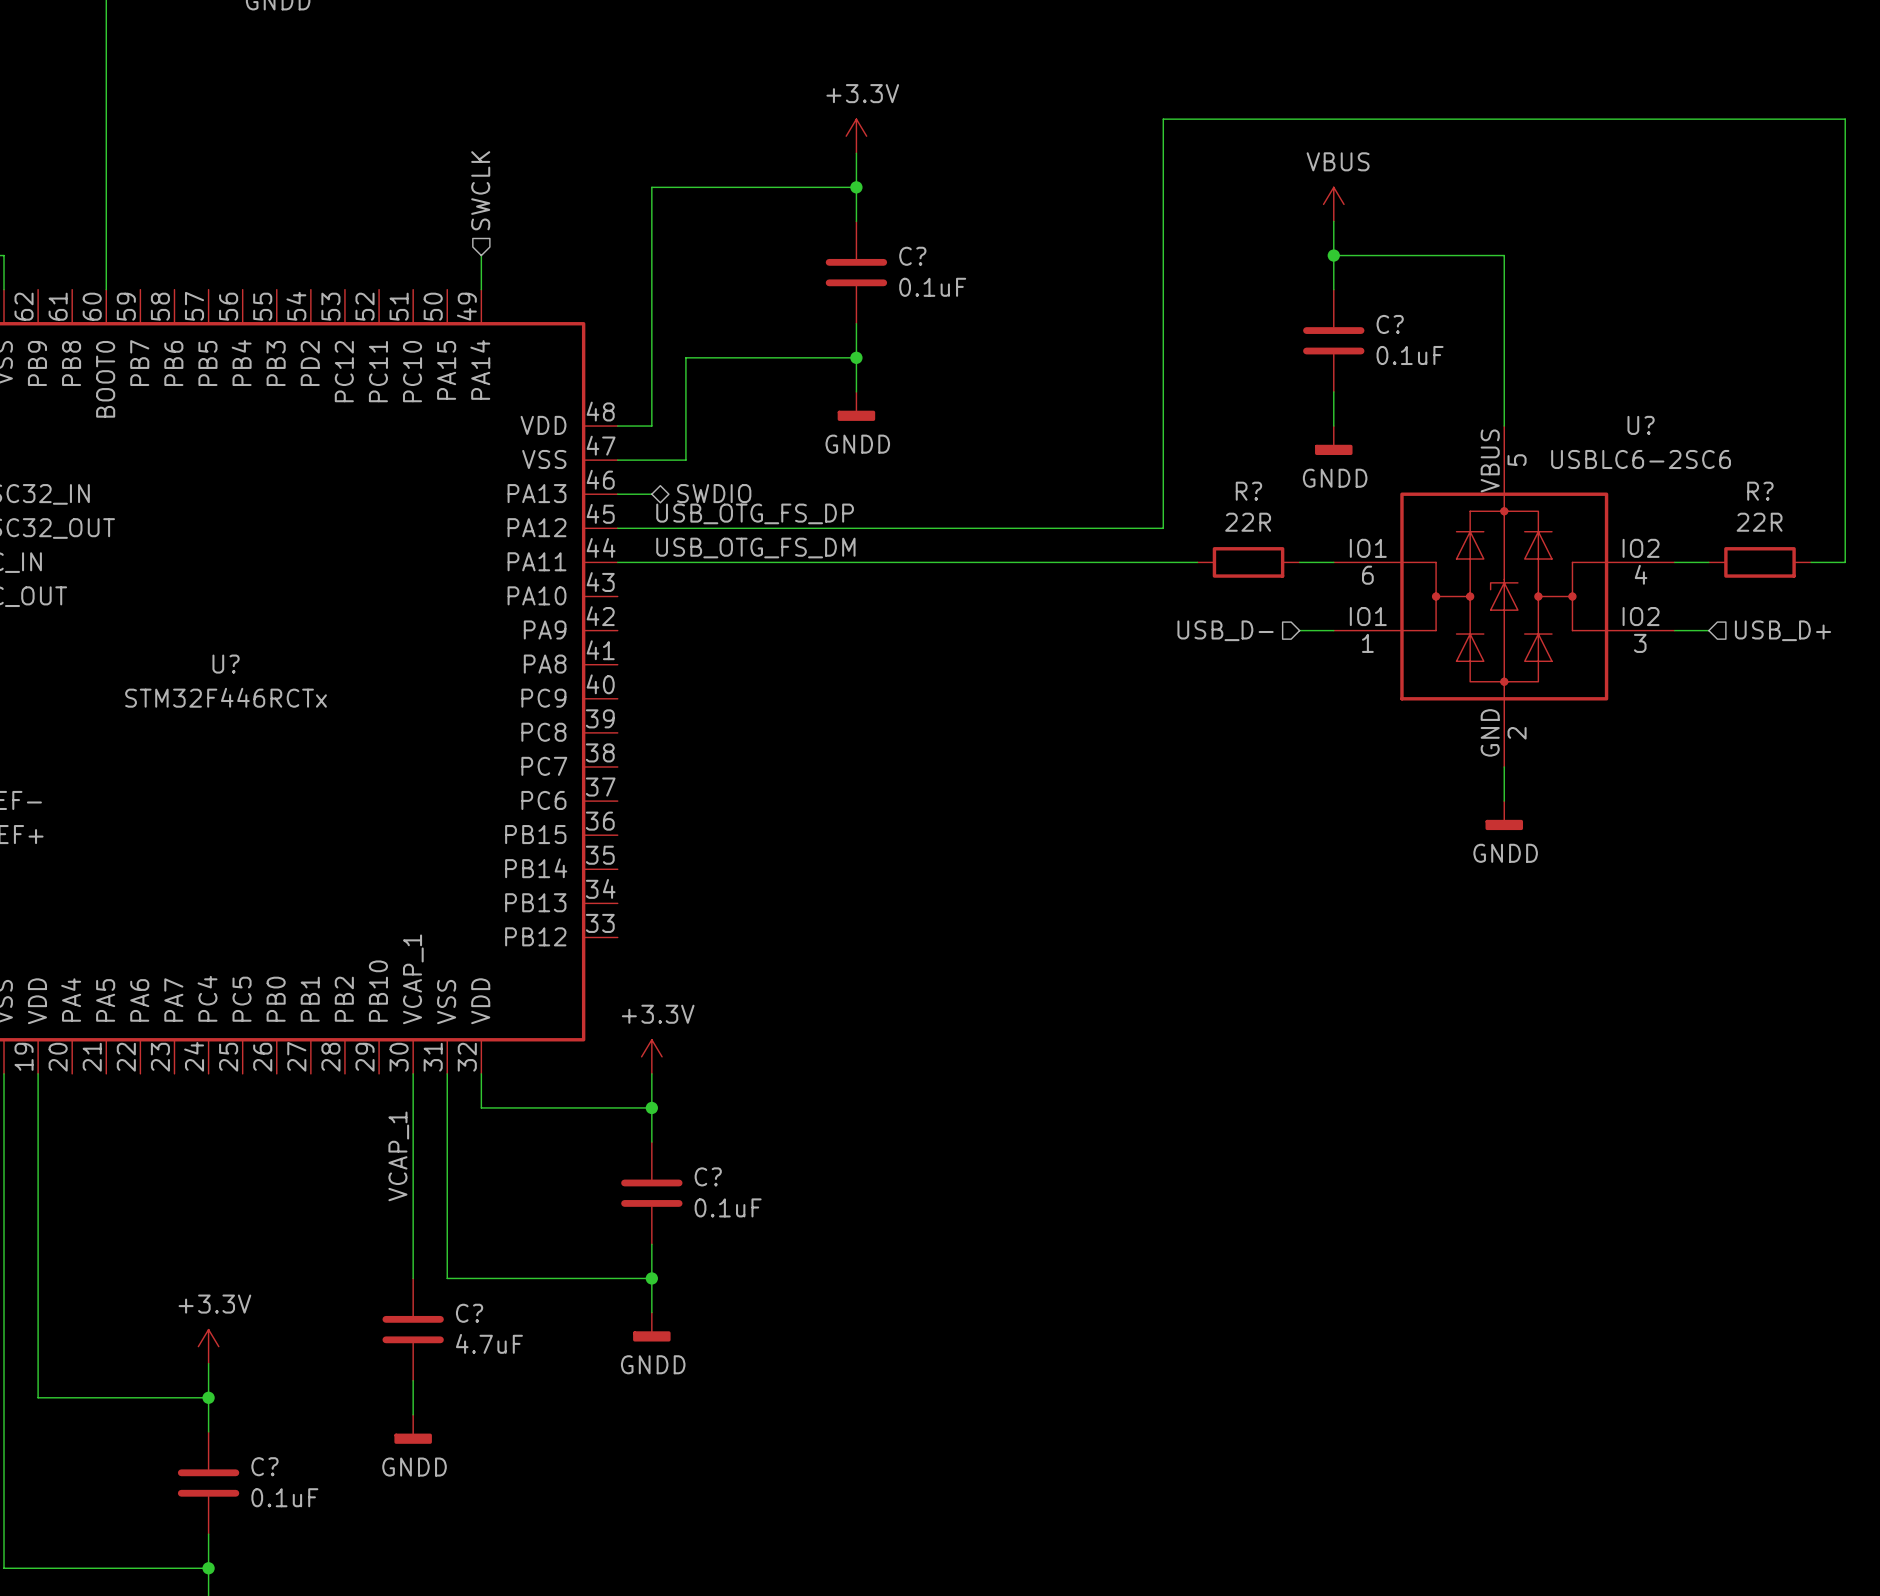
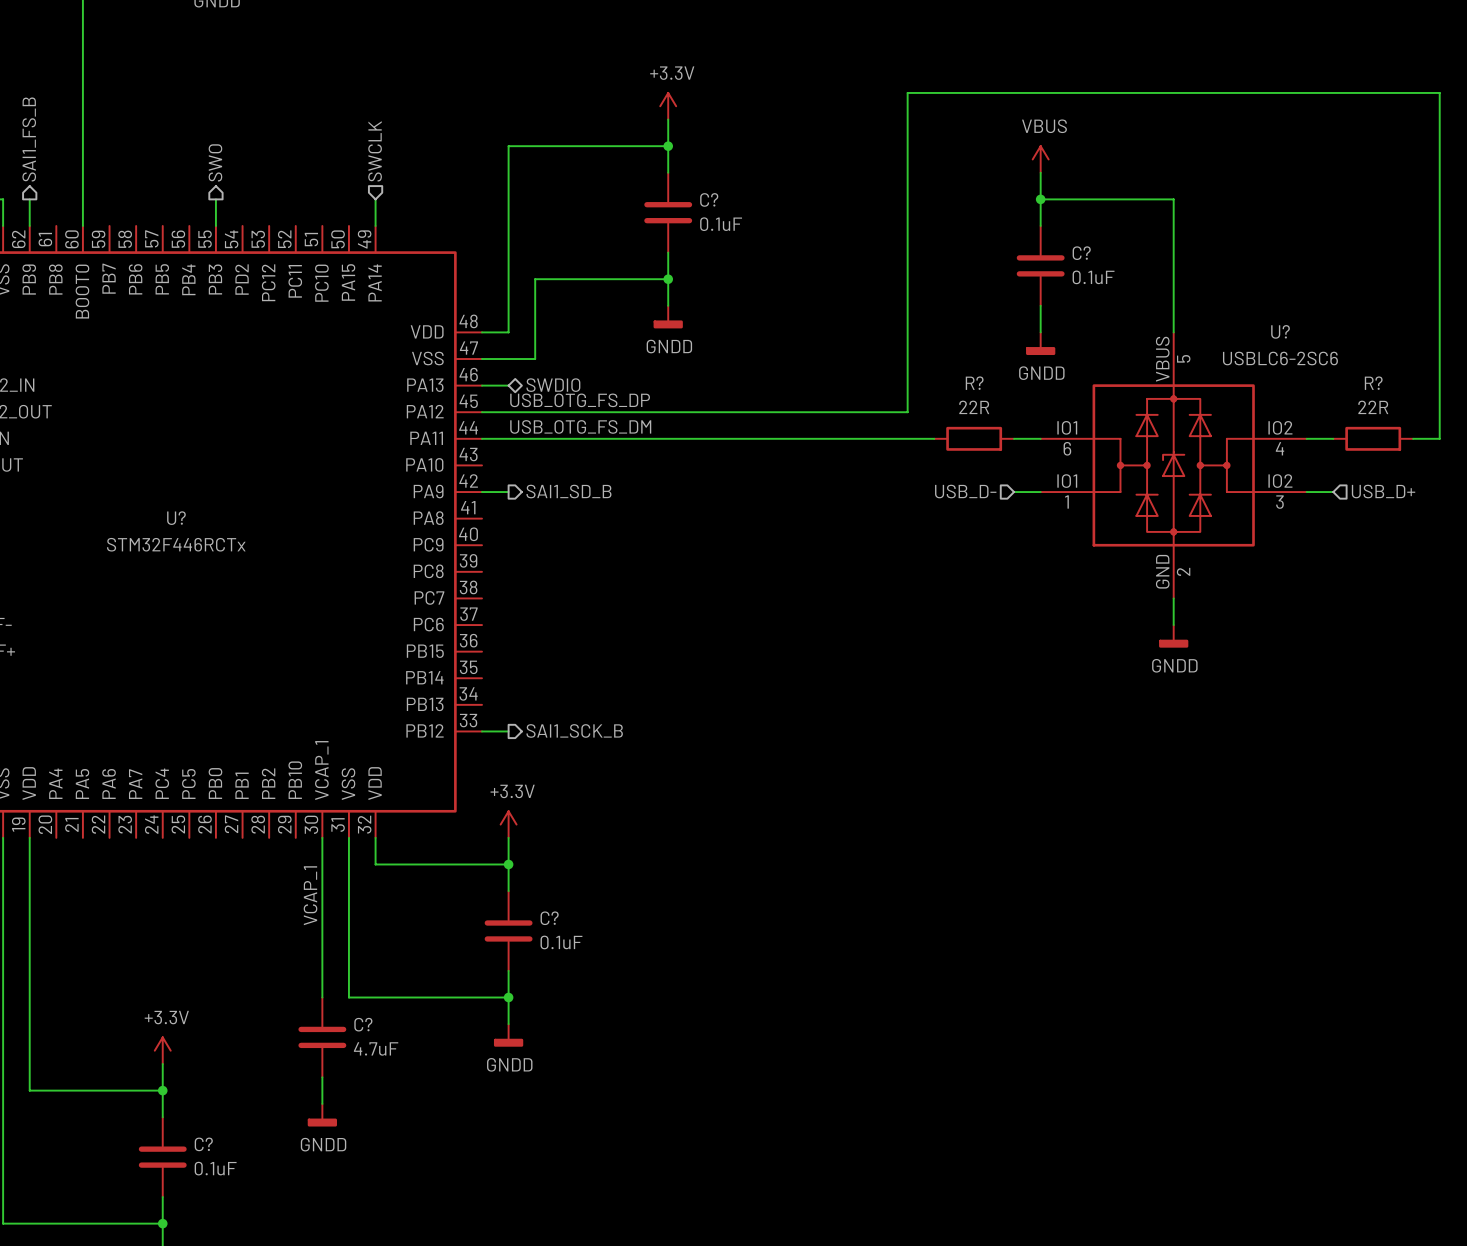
hierarchical label: none -> SAI1_FS_B (29, 139)
hierarchical label: none -> SWO (215, 162)
wire: none -> (29, 199) (29, 225)
wire: none -> (215, 199) (215, 225)
wire: none -> (481, 492) (508, 492)
hierarchical label: none -> SAI1_SD_B (568, 491)
wire: none -> (481, 731) (508, 731)
hierarchical label: none -> SAI1_SCK_B (574, 730)

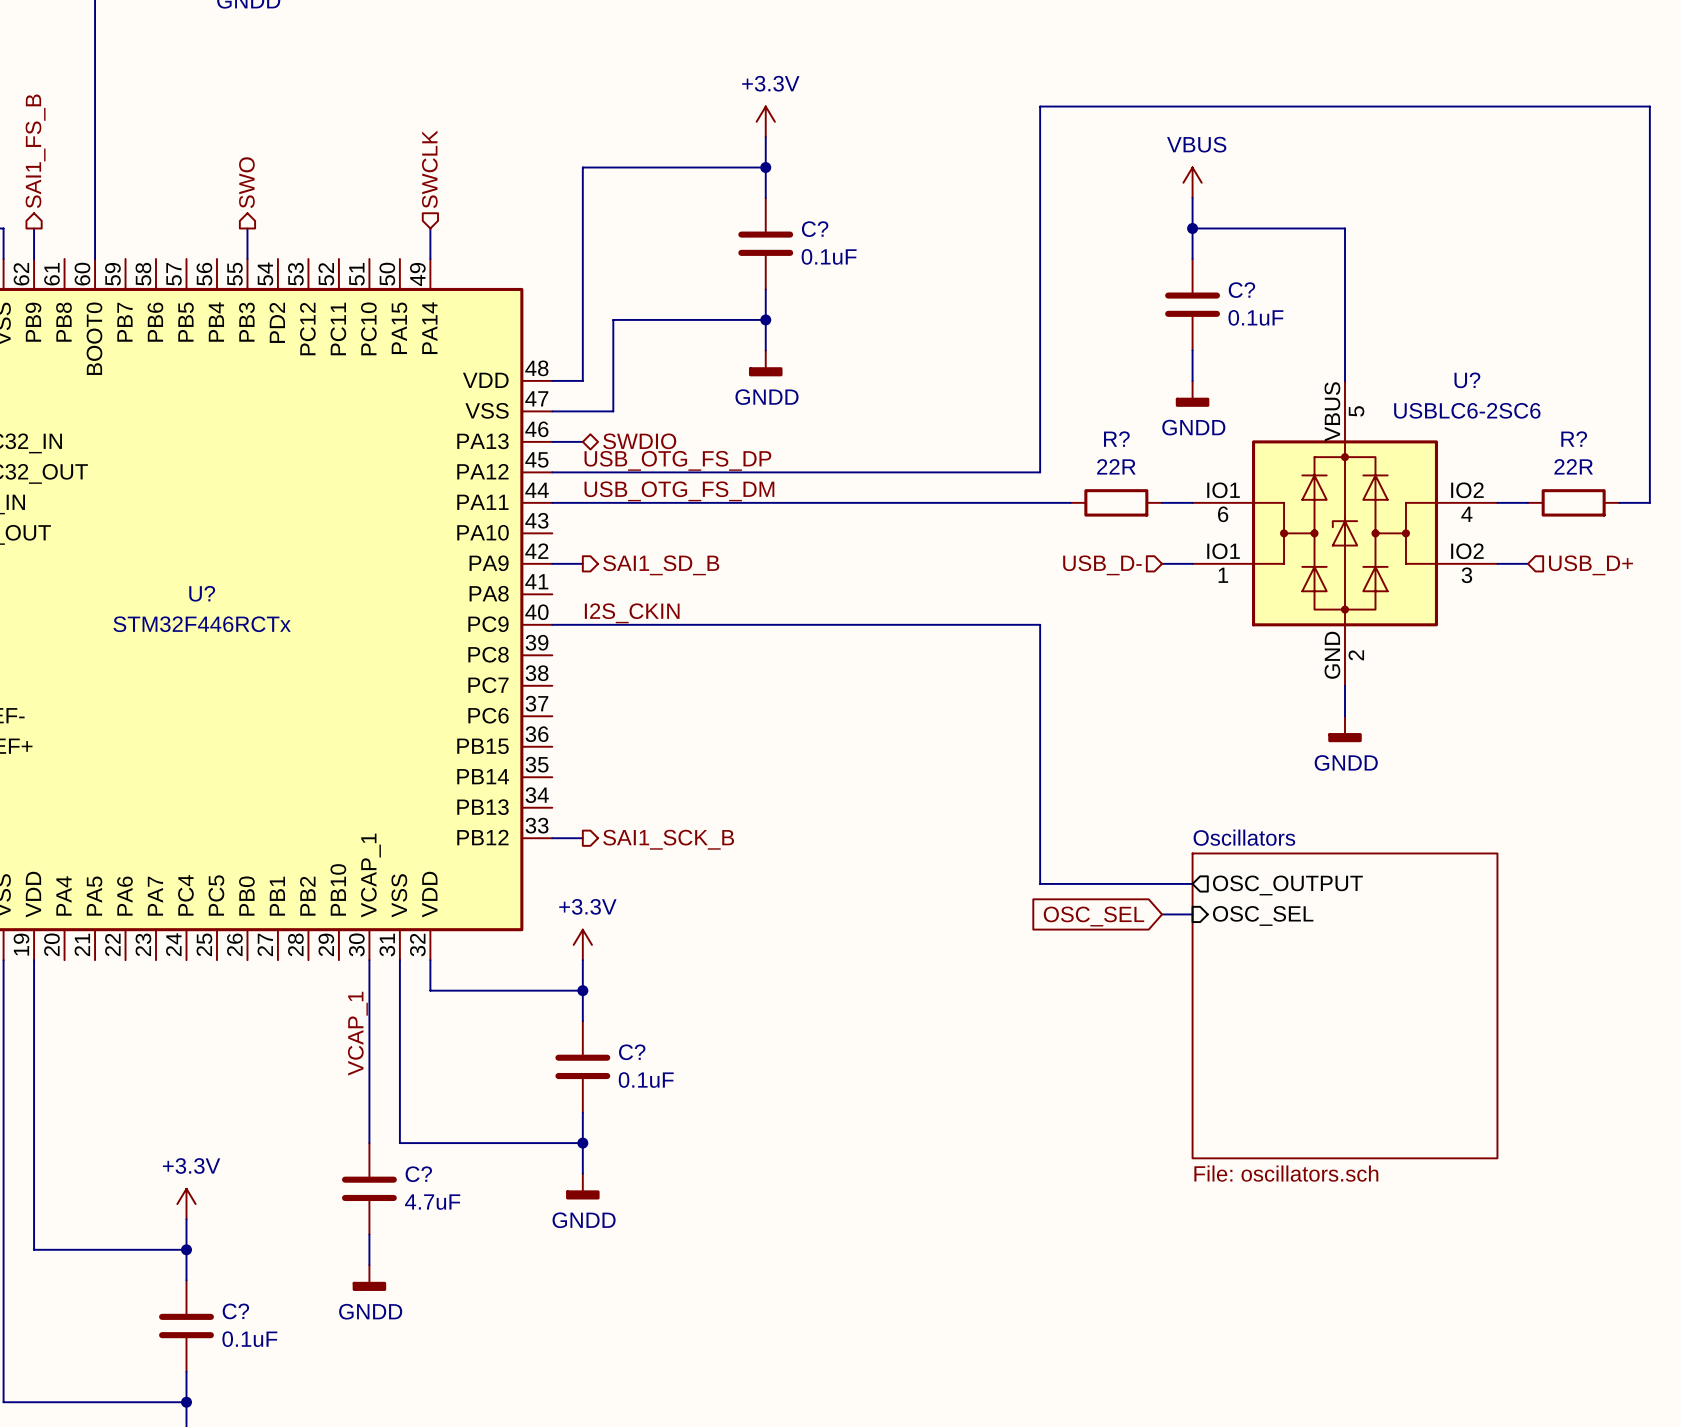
label: none -> I2S_CKIN (632, 613)
wire: none -> (552, 624) (1040, 624) (1040, 883) (1192, 883)
sheet pin: none -> OSC_OUTPUT (1287, 885)
global label: none -> OSC_SEL (1093, 916)
wire: none -> (1162, 914) (1192, 914)
sheet pin: none -> OSC_SEL (1263, 915)
sheet Oscillators: none -> File: oscillators.sch (1345, 1005)

